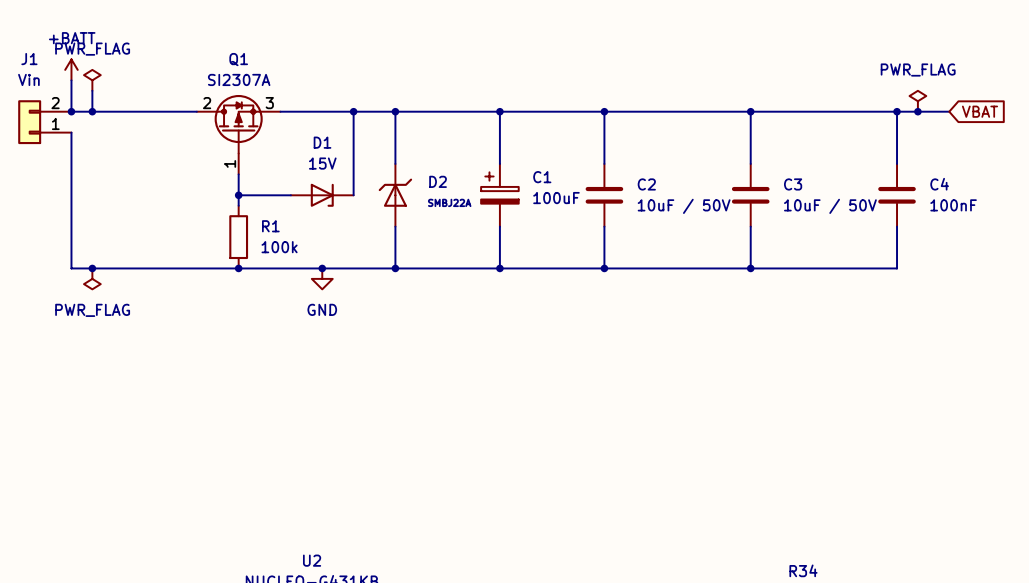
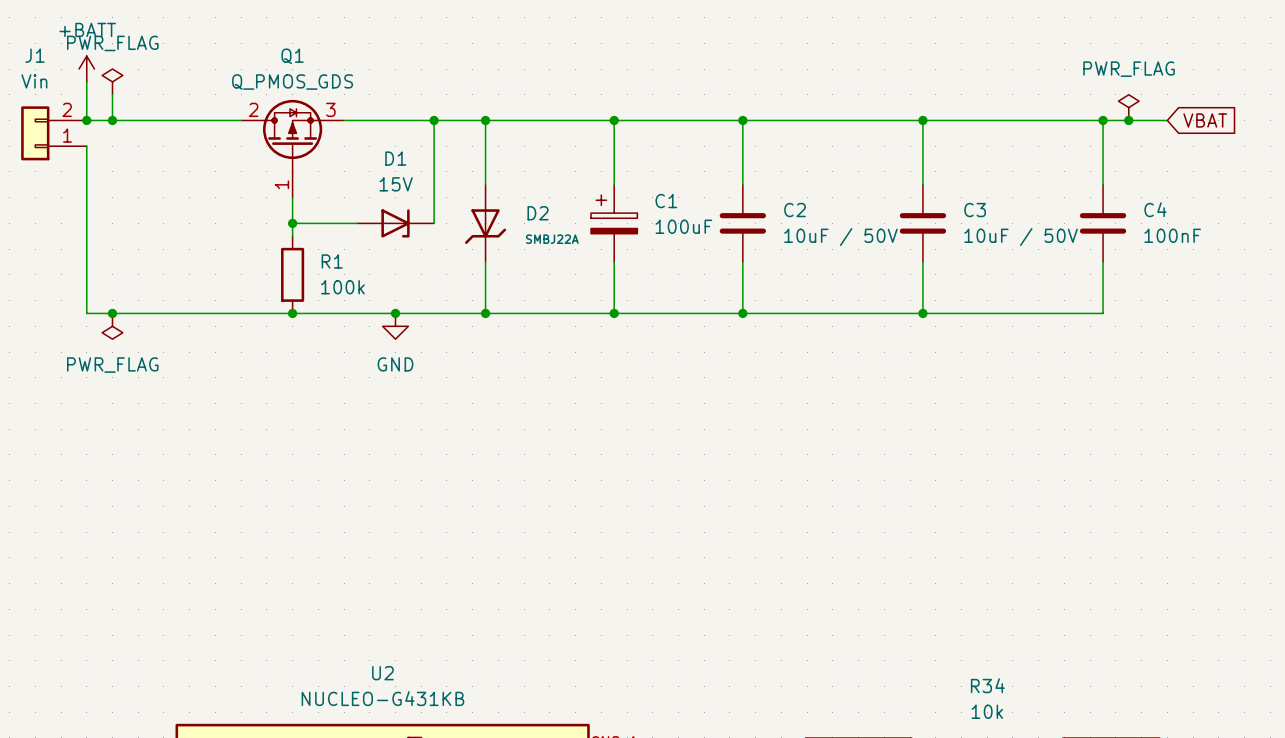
Q1 value: SI2307A (239, 79) -> Q_PMOS_GDS (292, 82)
D2 rotation: 0° (395, 192) -> 180° (485, 226)

